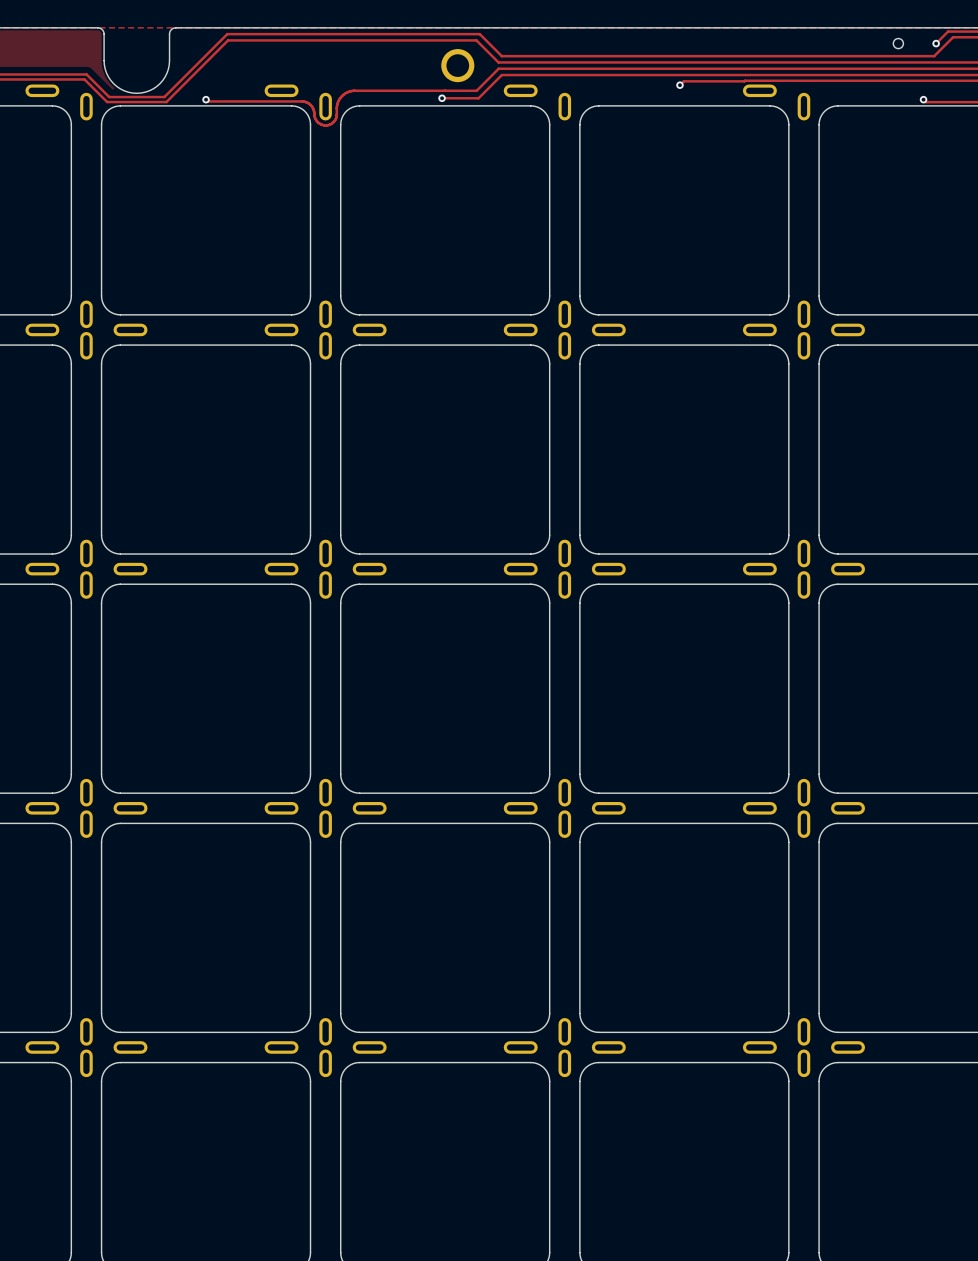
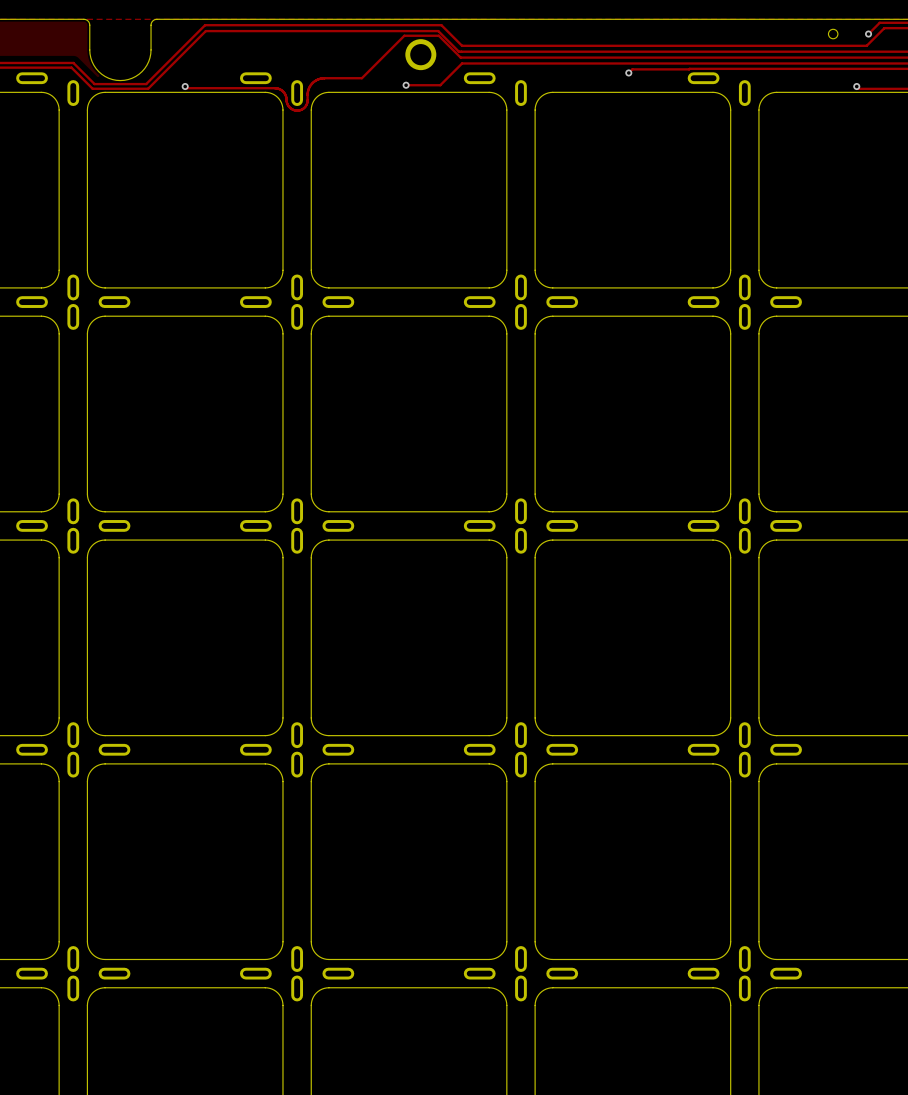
track: (500, 68) (476, 90) (394, 90) -> (460, 57) (438, 35) (404, 35) (361, 78)

